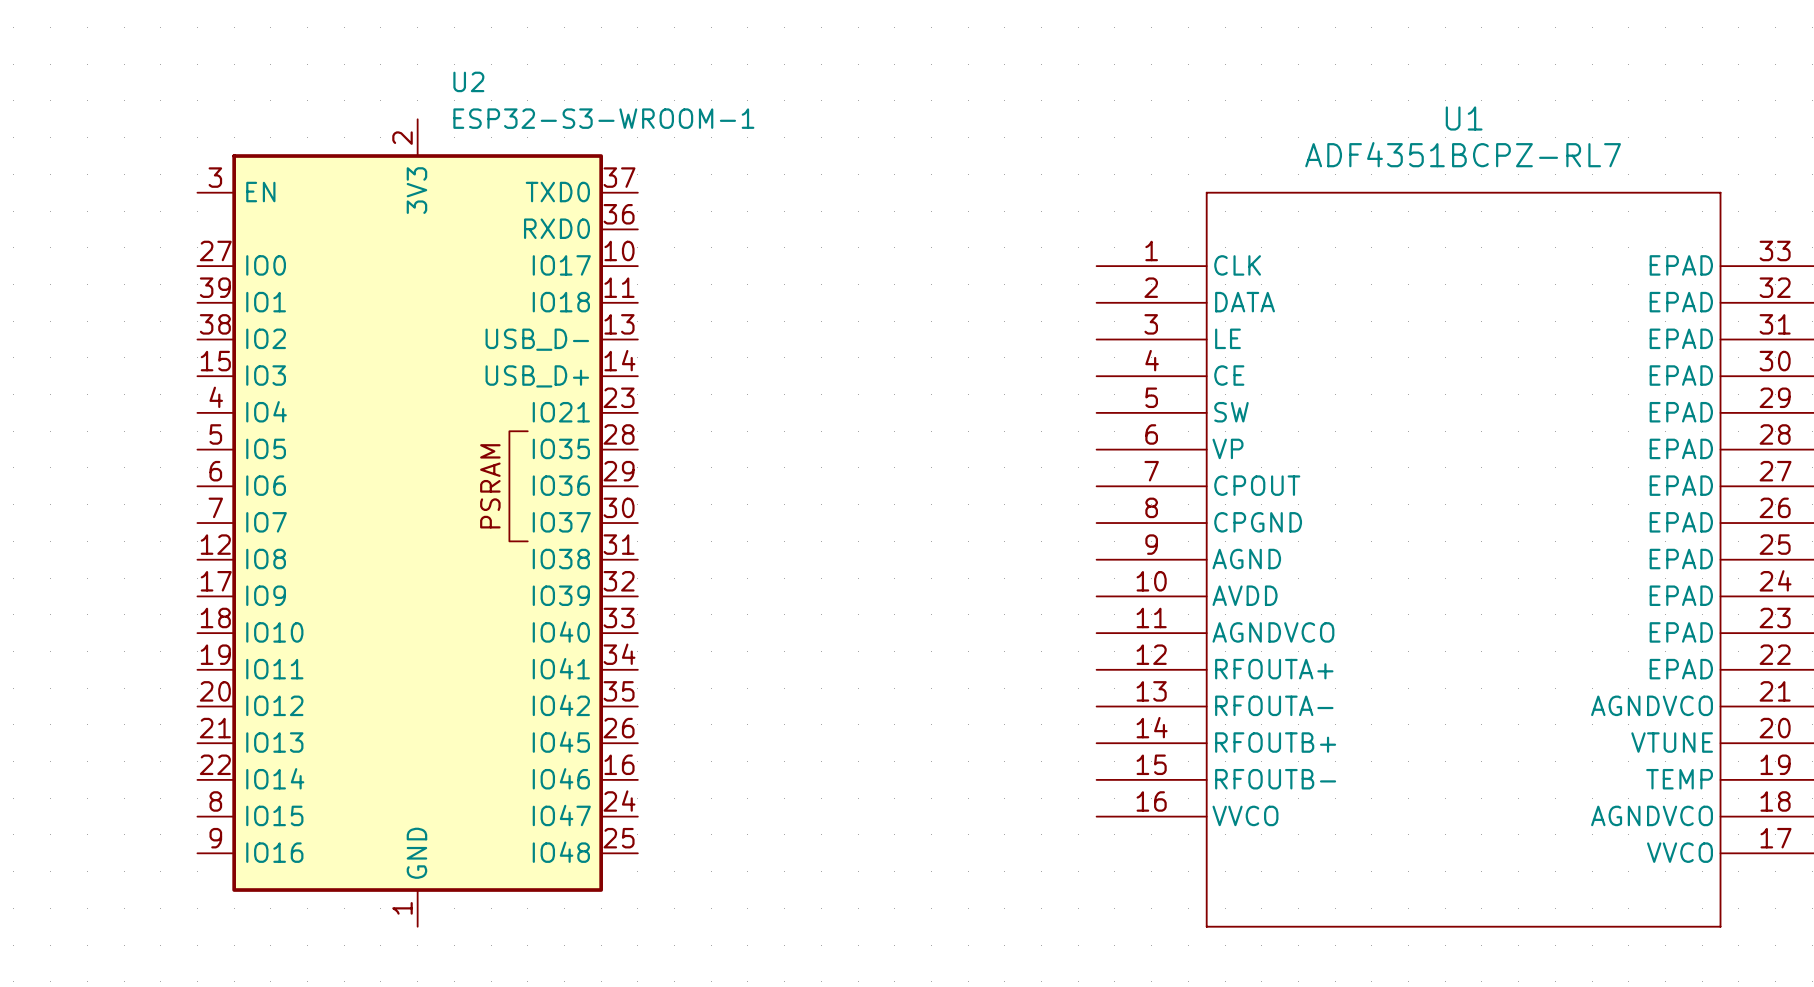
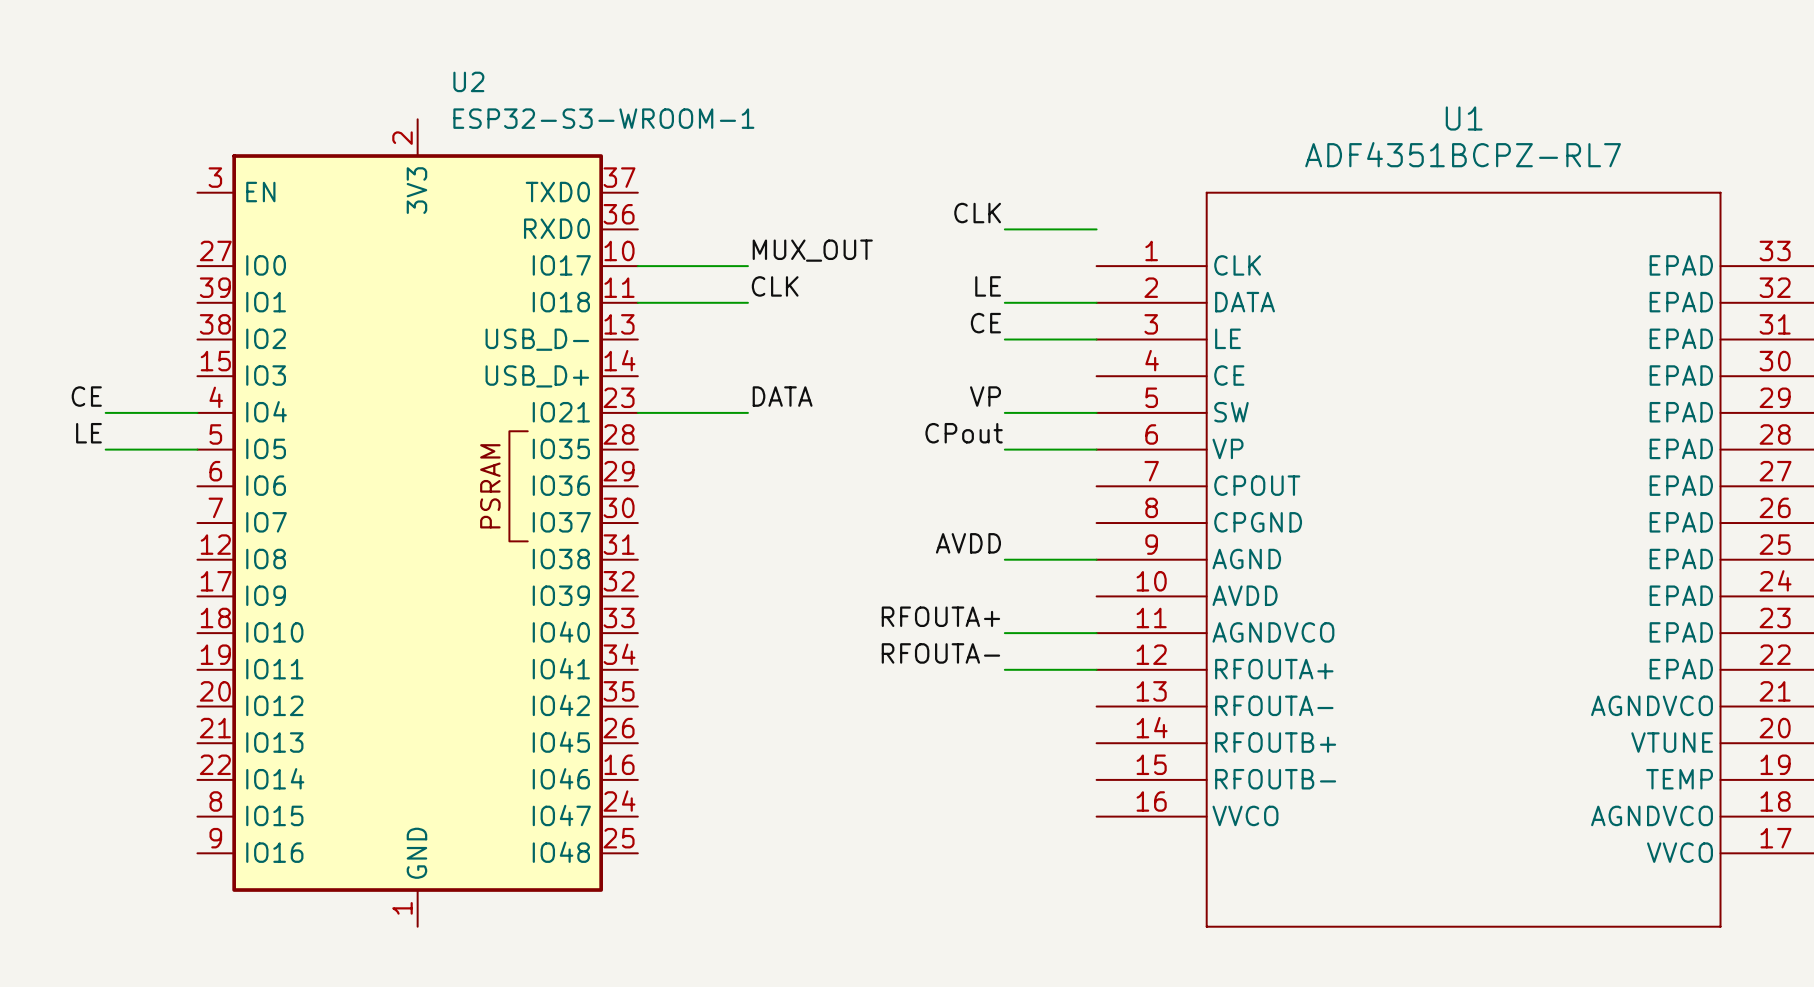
label: none -> CLK (977, 213)
wire: none -> (1004, 229) (1096, 229)
label: none -> MUX_OUT (812, 250)
wire: none -> (637, 266) (747, 266)
label: none -> CLK (775, 286)
label: none -> LE (988, 286)
wire: none -> (637, 302) (747, 302)
wire: none -> (1004, 302) (1096, 302)
label: none -> CE (985, 323)
wire: none -> (1004, 339) (1096, 339)
label: none -> CE (86, 396)
label: none -> DATA (782, 396)
label: none -> VP (985, 396)
wire: none -> (105, 412) (197, 412)
wire: none -> (637, 412) (747, 412)
wire: none -> (1004, 412) (1096, 412)
label: none -> LE (88, 433)
label: none -> CPout (964, 433)
wire: none -> (105, 449) (197, 449)
wire: none -> (1004, 449) (1096, 449)
label: none -> AVDD (968, 543)
wire: none -> (1004, 559) (1096, 559)
label: none -> RFOUTA+ (940, 616)
wire: none -> (1004, 633) (1096, 633)
label: none -> RFOUTA- (940, 653)
wire: none -> (1004, 669) (1096, 669)

